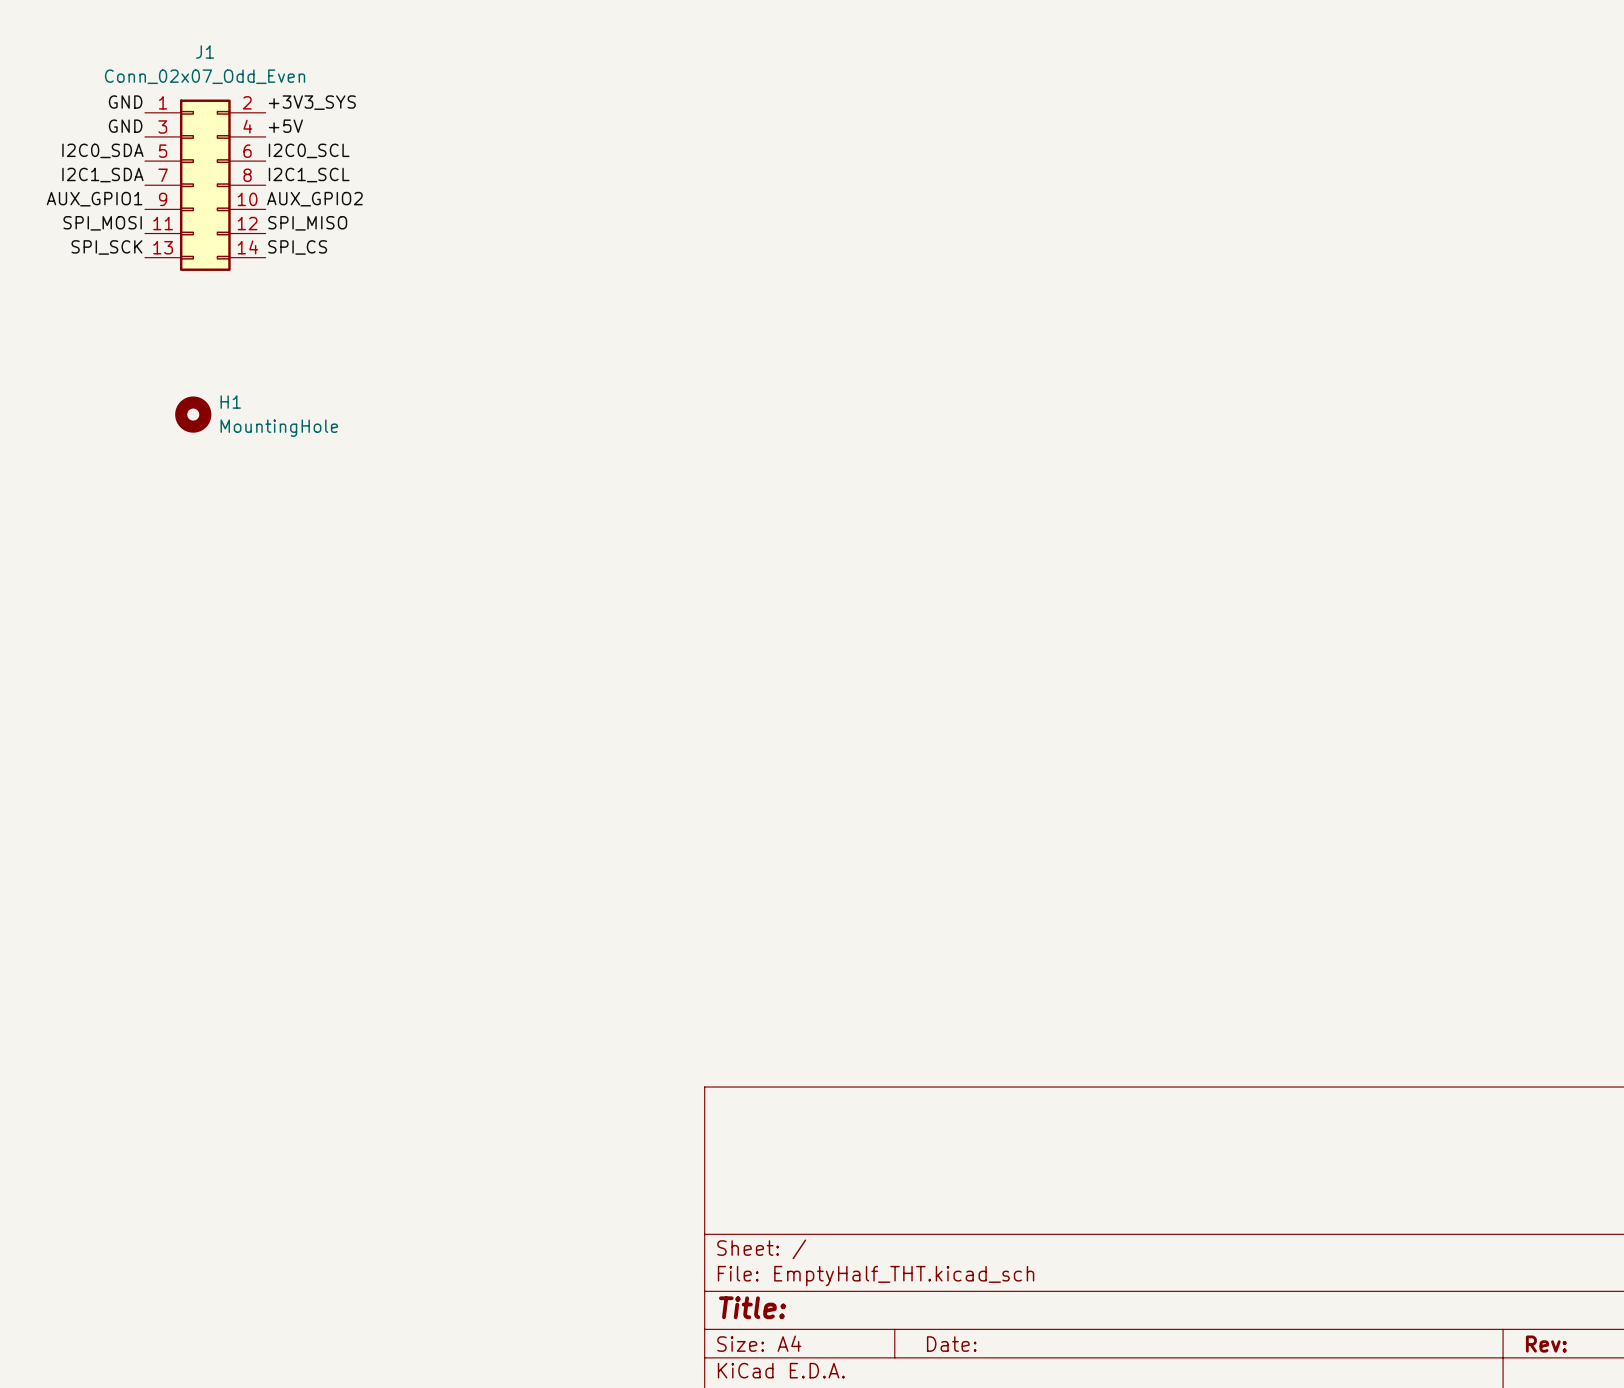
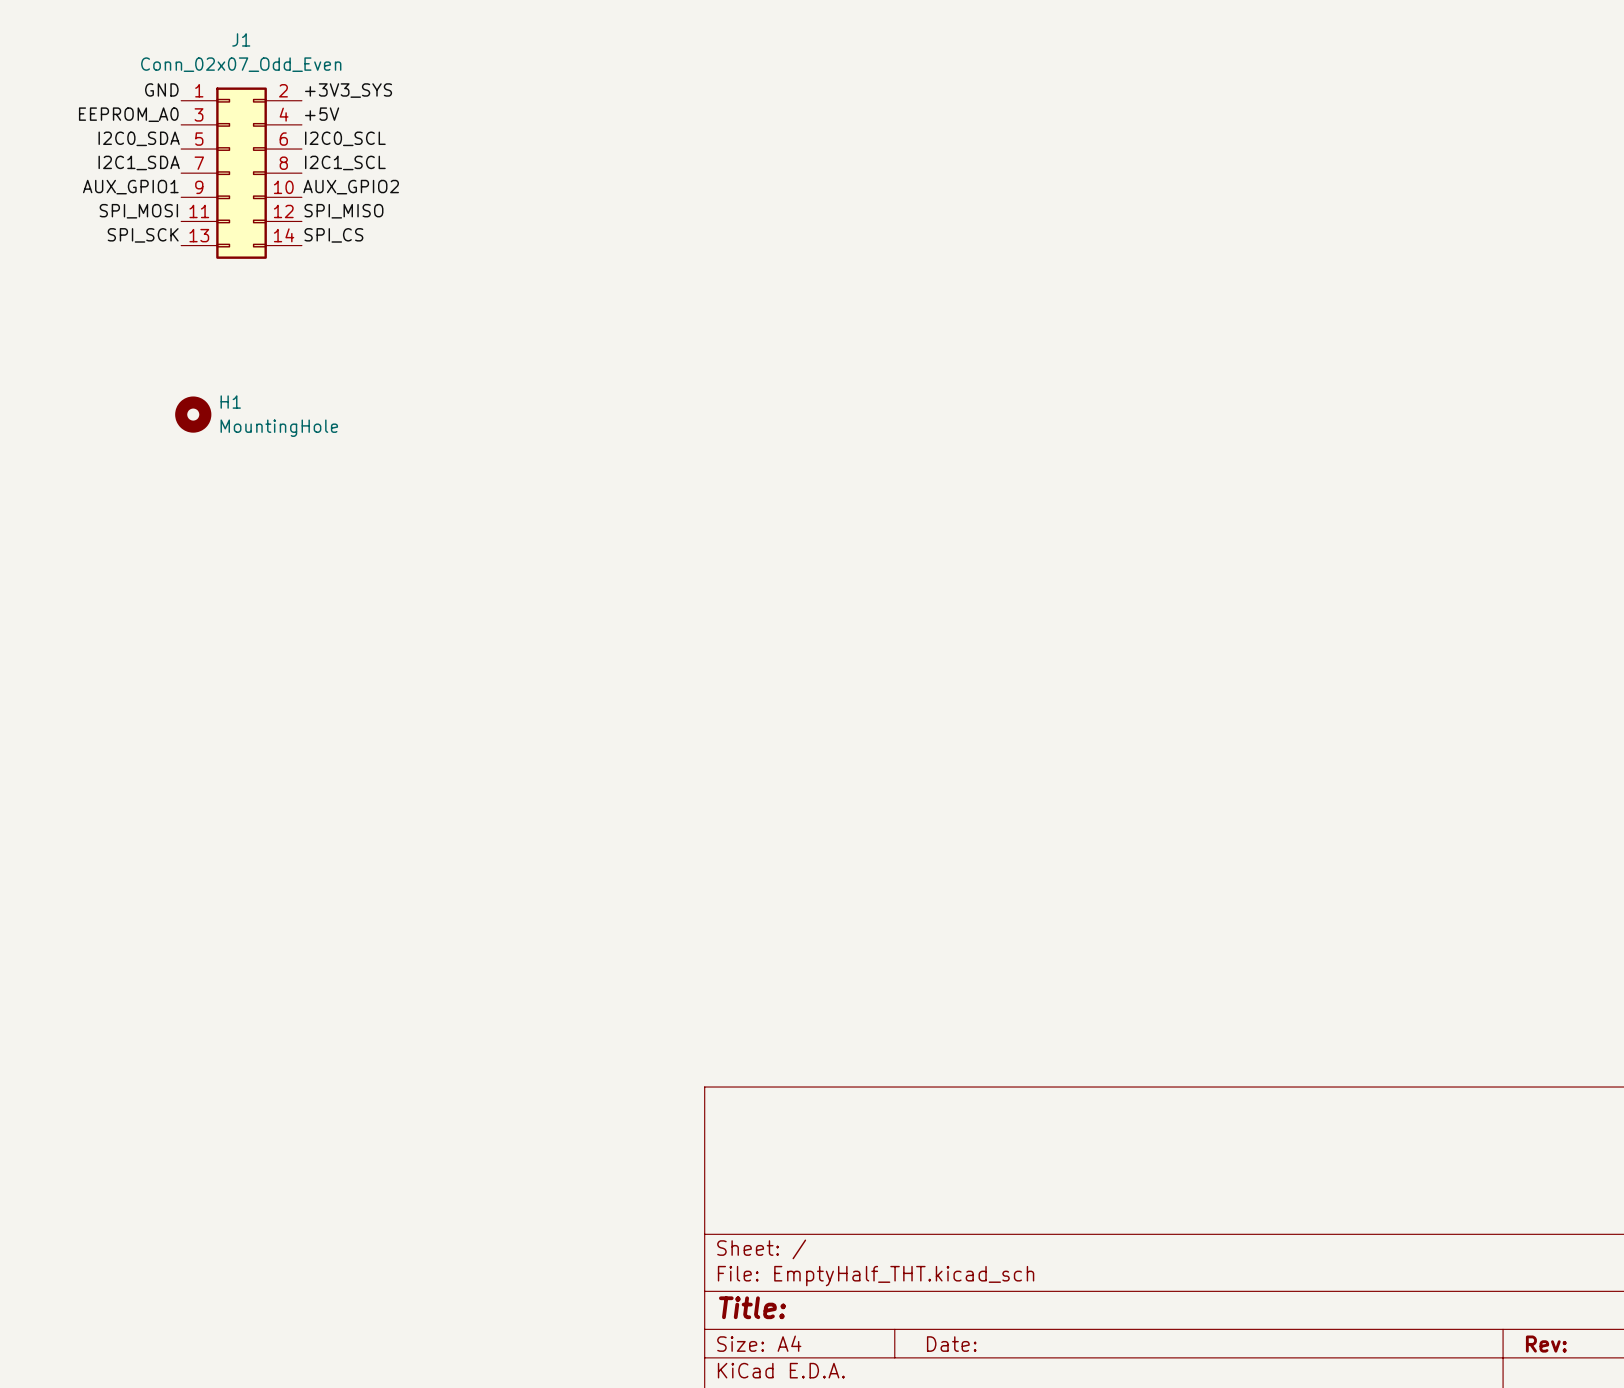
label position: GND (125, 102) -> GND (161, 89)
label position: +3V3_SYS (312, 102) -> +3V3_SYS (348, 90)
label: none -> EEPROM_A0 (128, 114)
label: GND (125, 126) -> none
label position: +5V (285, 126) -> +5V (322, 114)
label position: I2C0_SDA (102, 150) -> I2C0_SDA (139, 138)
label position: I2C0_SCL (309, 150) -> I2C0_SCL (345, 138)
label position: I2C1_SDA (102, 175) -> I2C1_SDA (139, 162)
label position: I2C1_SCL (309, 175) -> I2C1_SCL (345, 162)
J1 position: (205, 185) -> (241, 173)
label position: AUX_GPIO1 (94, 199) -> AUX_GPIO1 (130, 187)
label position: AUX_GPIO2 (314, 199) -> AUX_GPIO2 (351, 187)
label position: SPI_MOSI (102, 223) -> SPI_MOSI (138, 211)
label position: SPI_MISO (307, 223) -> SPI_MISO (343, 211)
label position: SPI_SCK (106, 247) -> SPI_SCK (143, 235)
label position: SPI_CS (297, 247) -> SPI_CS (333, 235)

